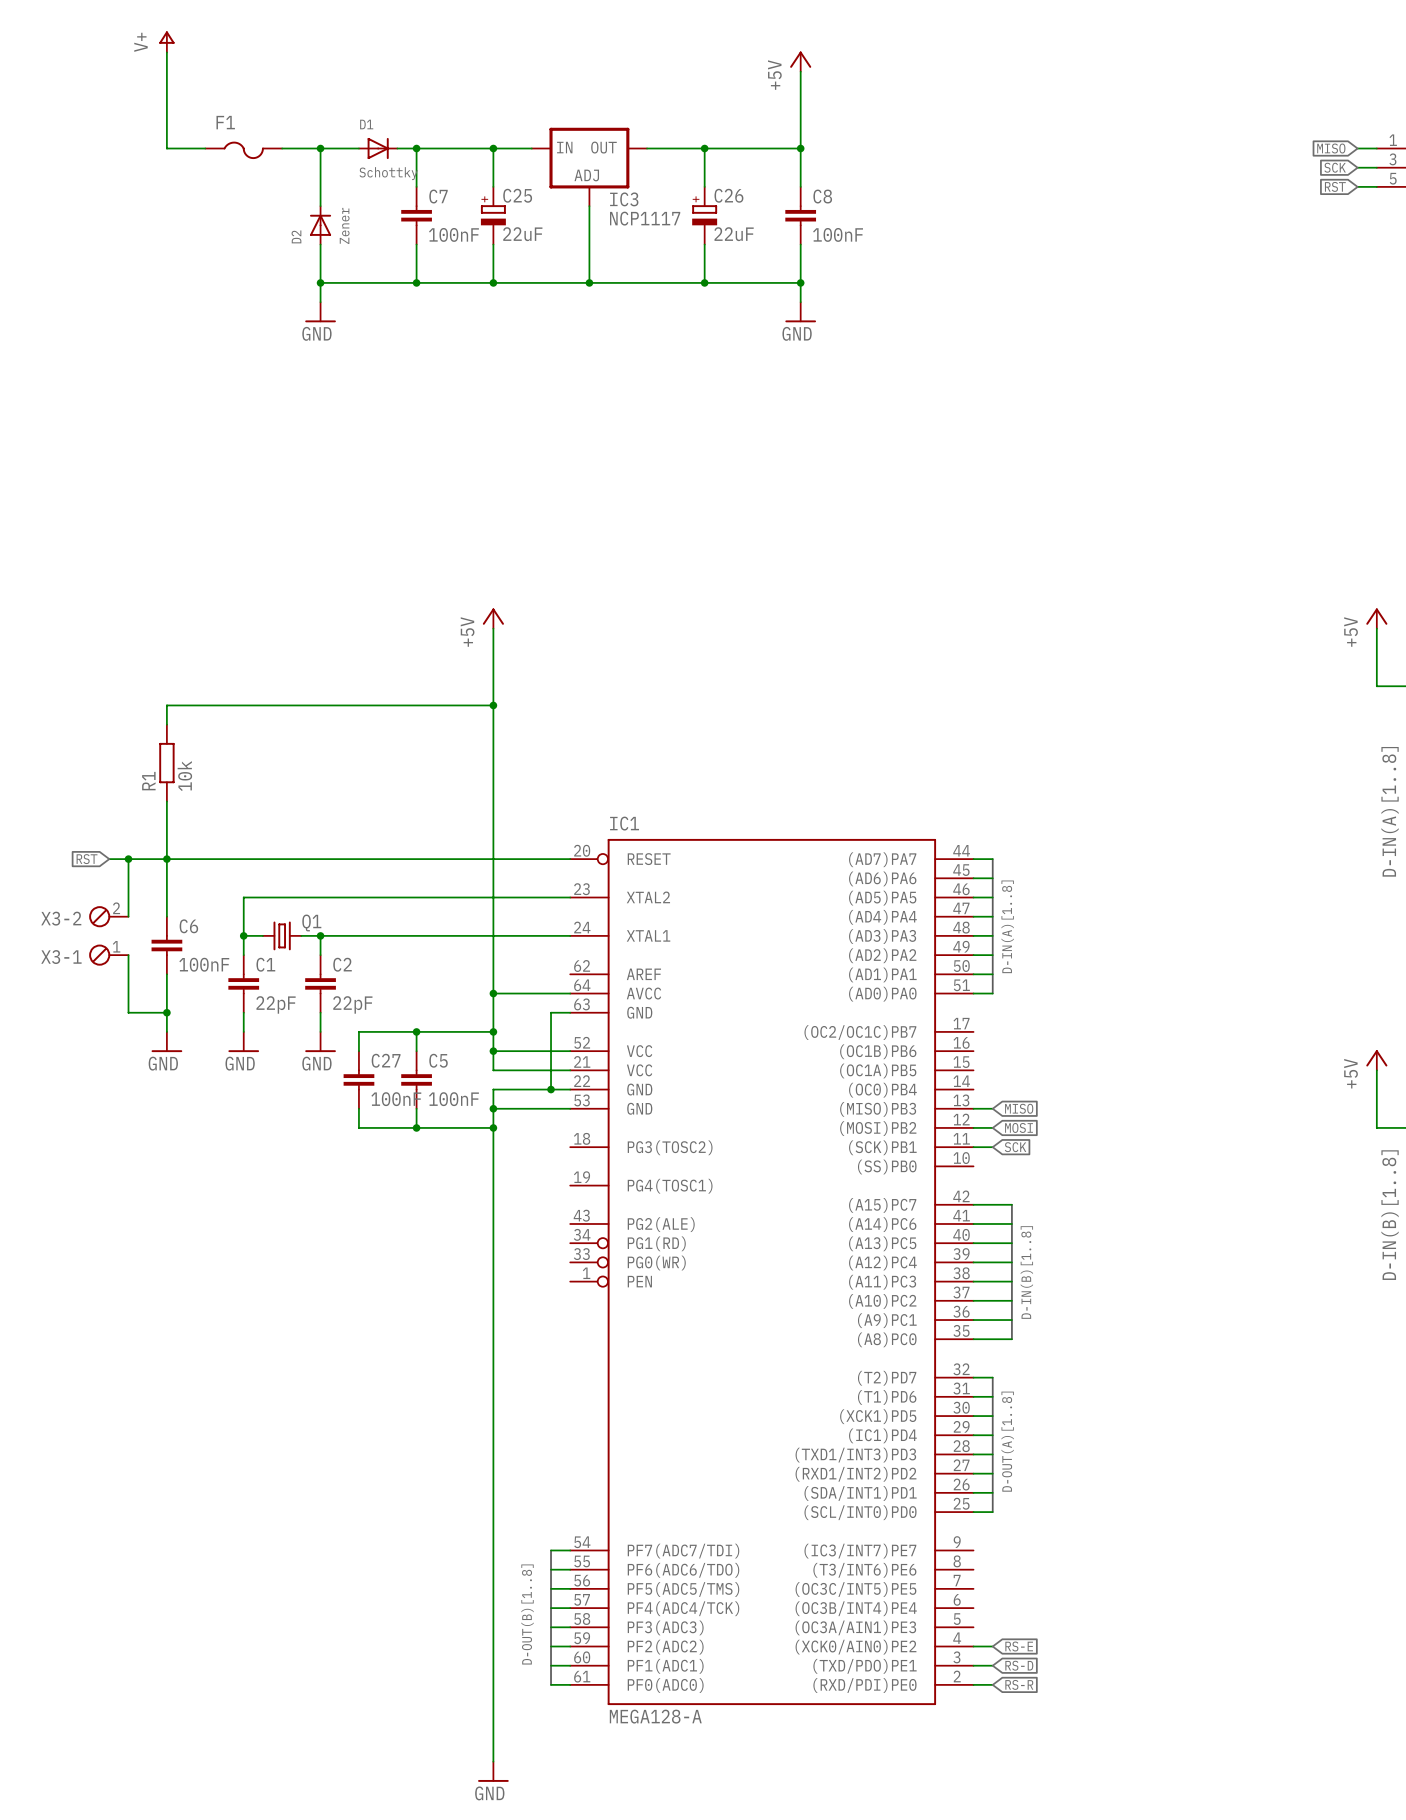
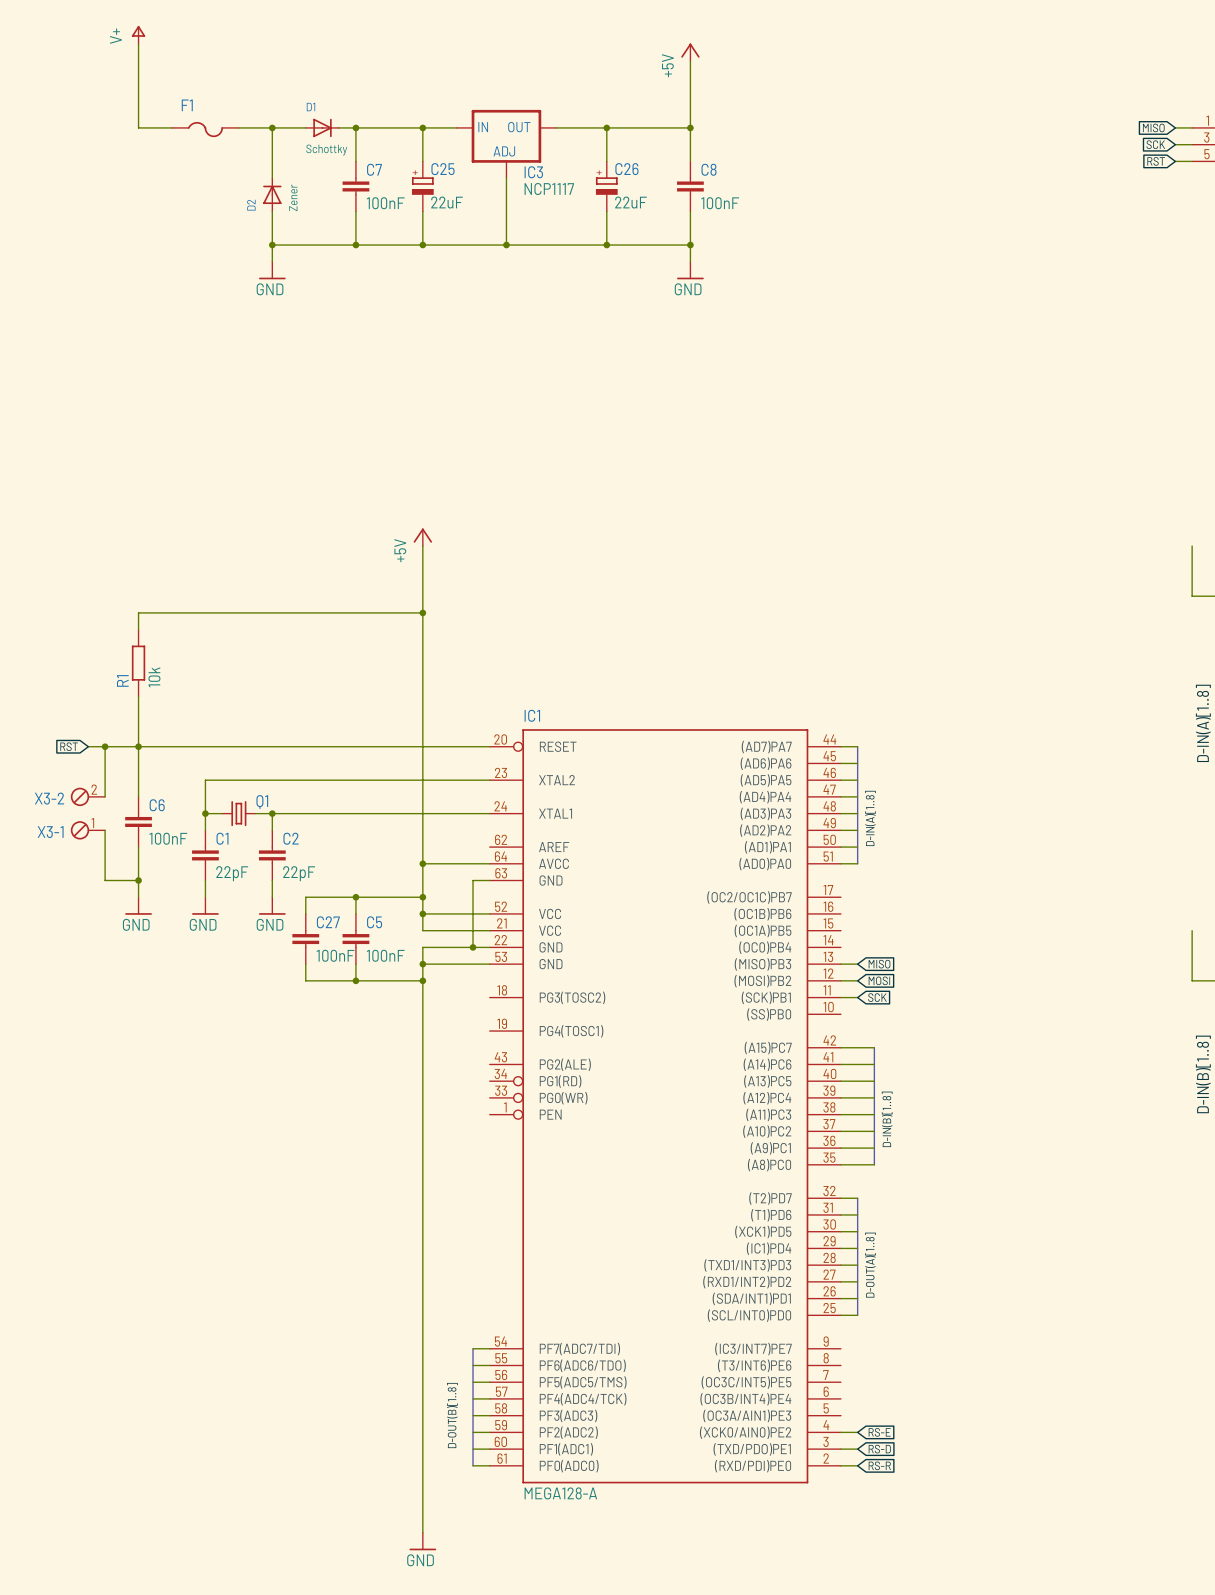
power symbol: +5V (1376, 618) -> none
power symbol: +5V (1376, 1060) -> none

